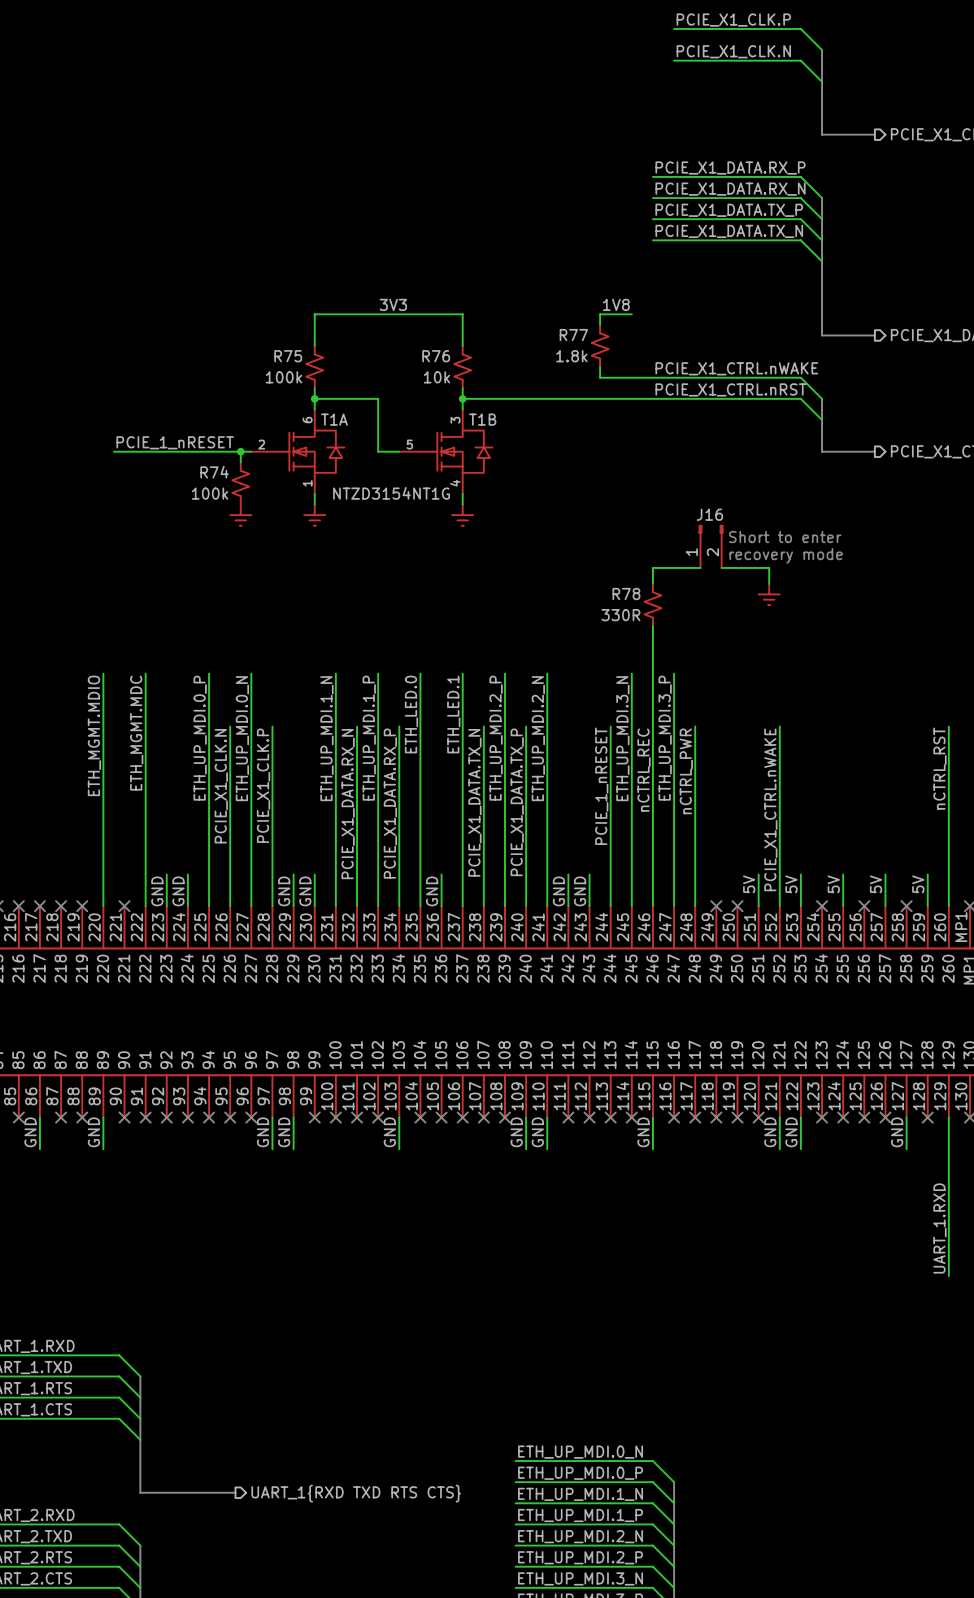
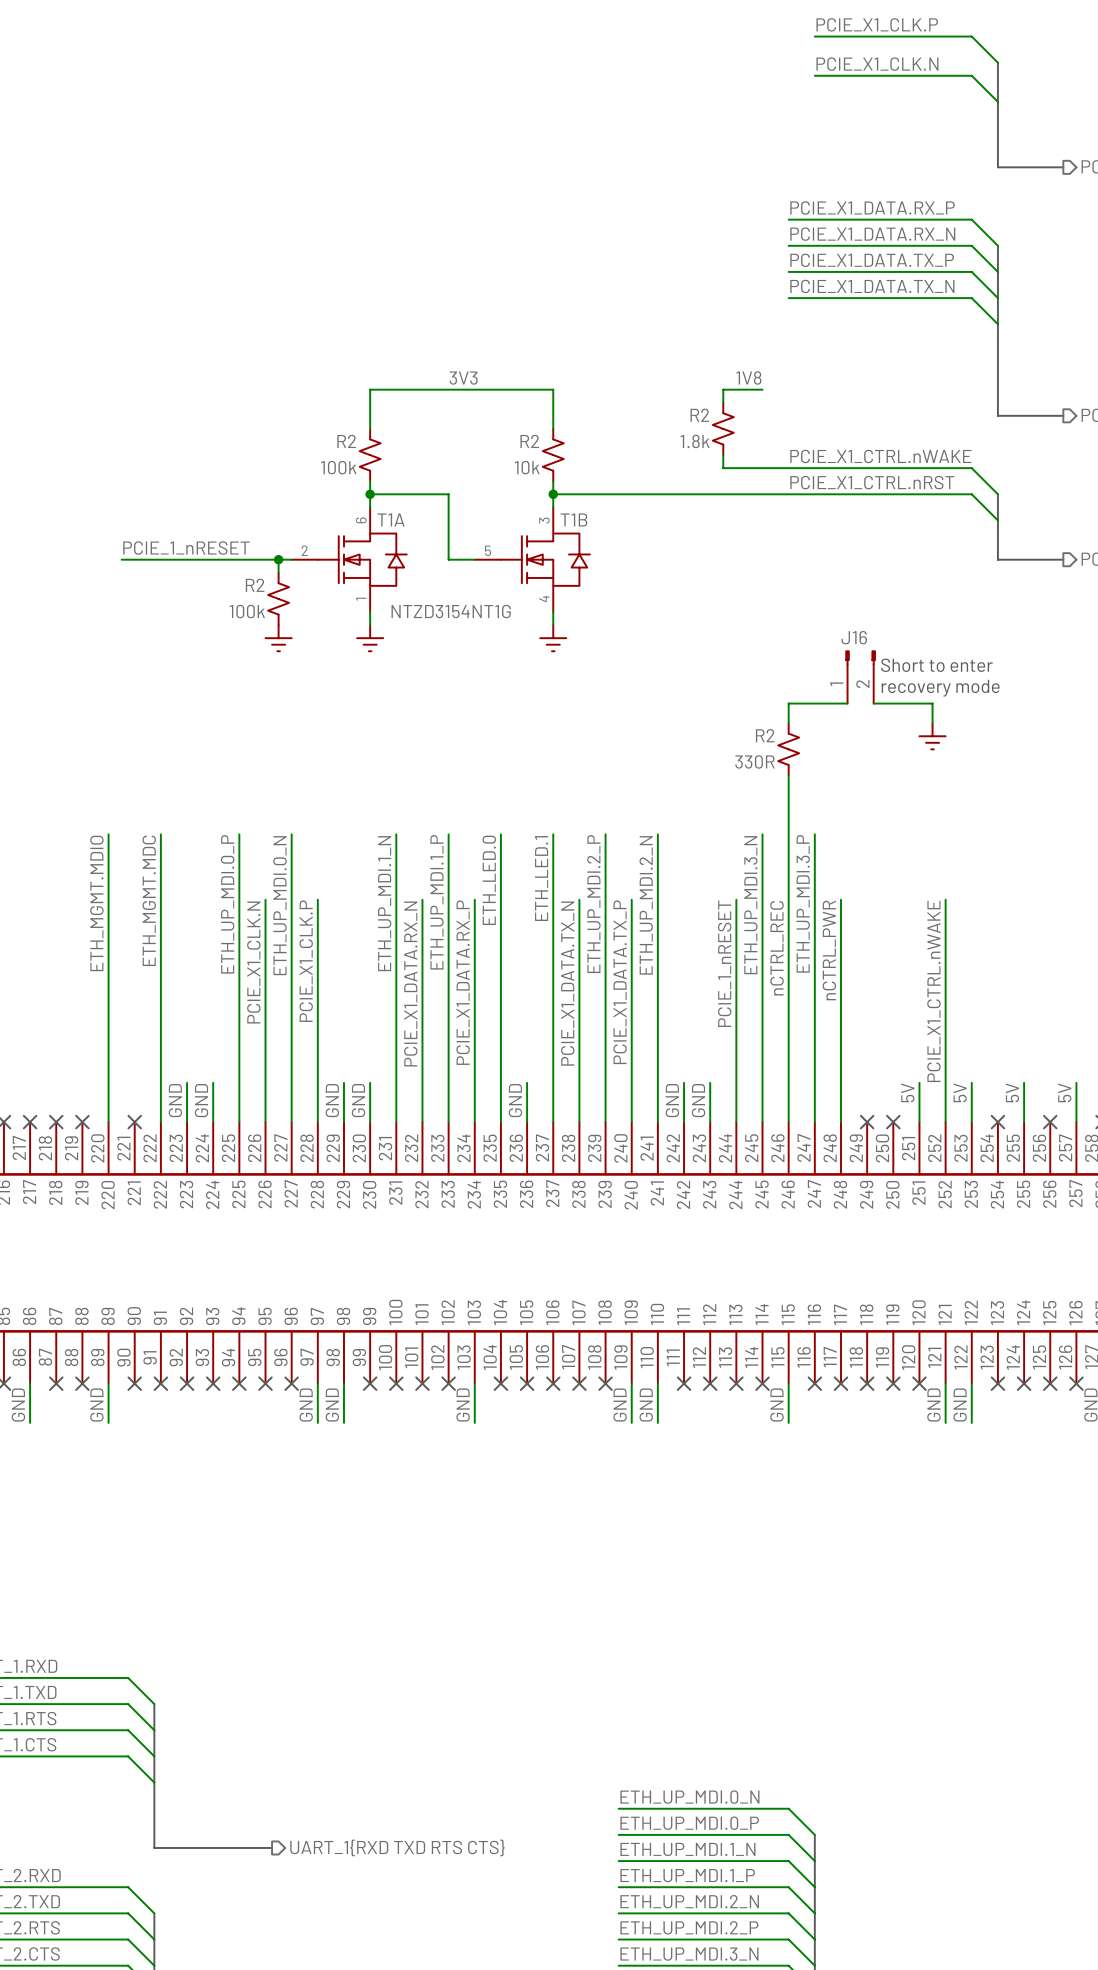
R77 name: R77 (573, 335) -> R2 (699, 415)
R75 name: R75 (288, 356) -> R2 (346, 441)
R76 name: R76 (436, 356) -> R2 (529, 441)
R74 name: R74 (214, 472) -> R2 (255, 585)
R78 name: R78 (626, 594) -> R2 (765, 735)

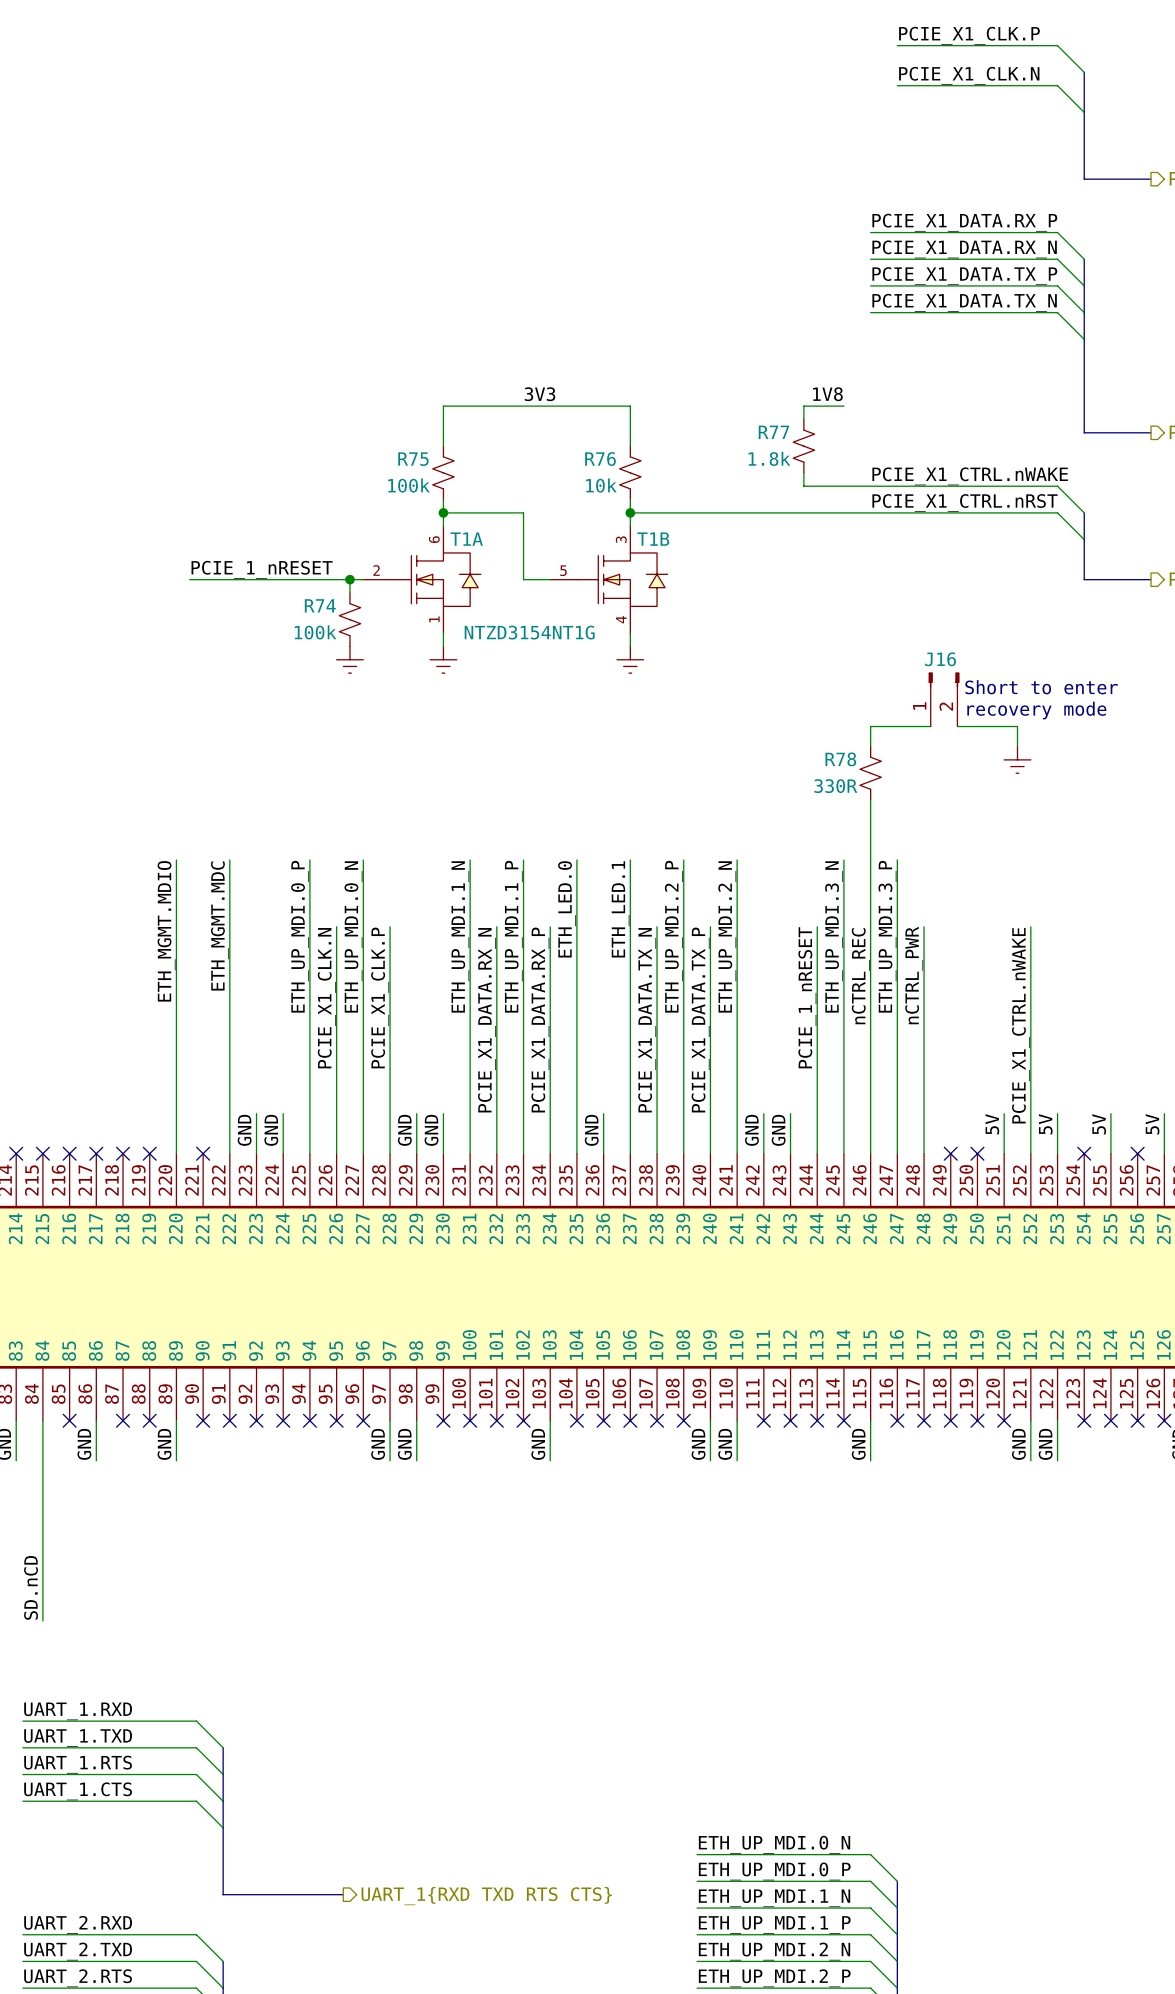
R2 name: R2 (699, 415) -> R77 (773, 432)
R2 name: R2 (346, 441) -> R75 (413, 459)
R2 name: R2 (529, 441) -> R76 (600, 459)
R2 name: R2 (255, 585) -> R74 (320, 605)
R2 name: R2 (765, 735) -> R78 (840, 759)

